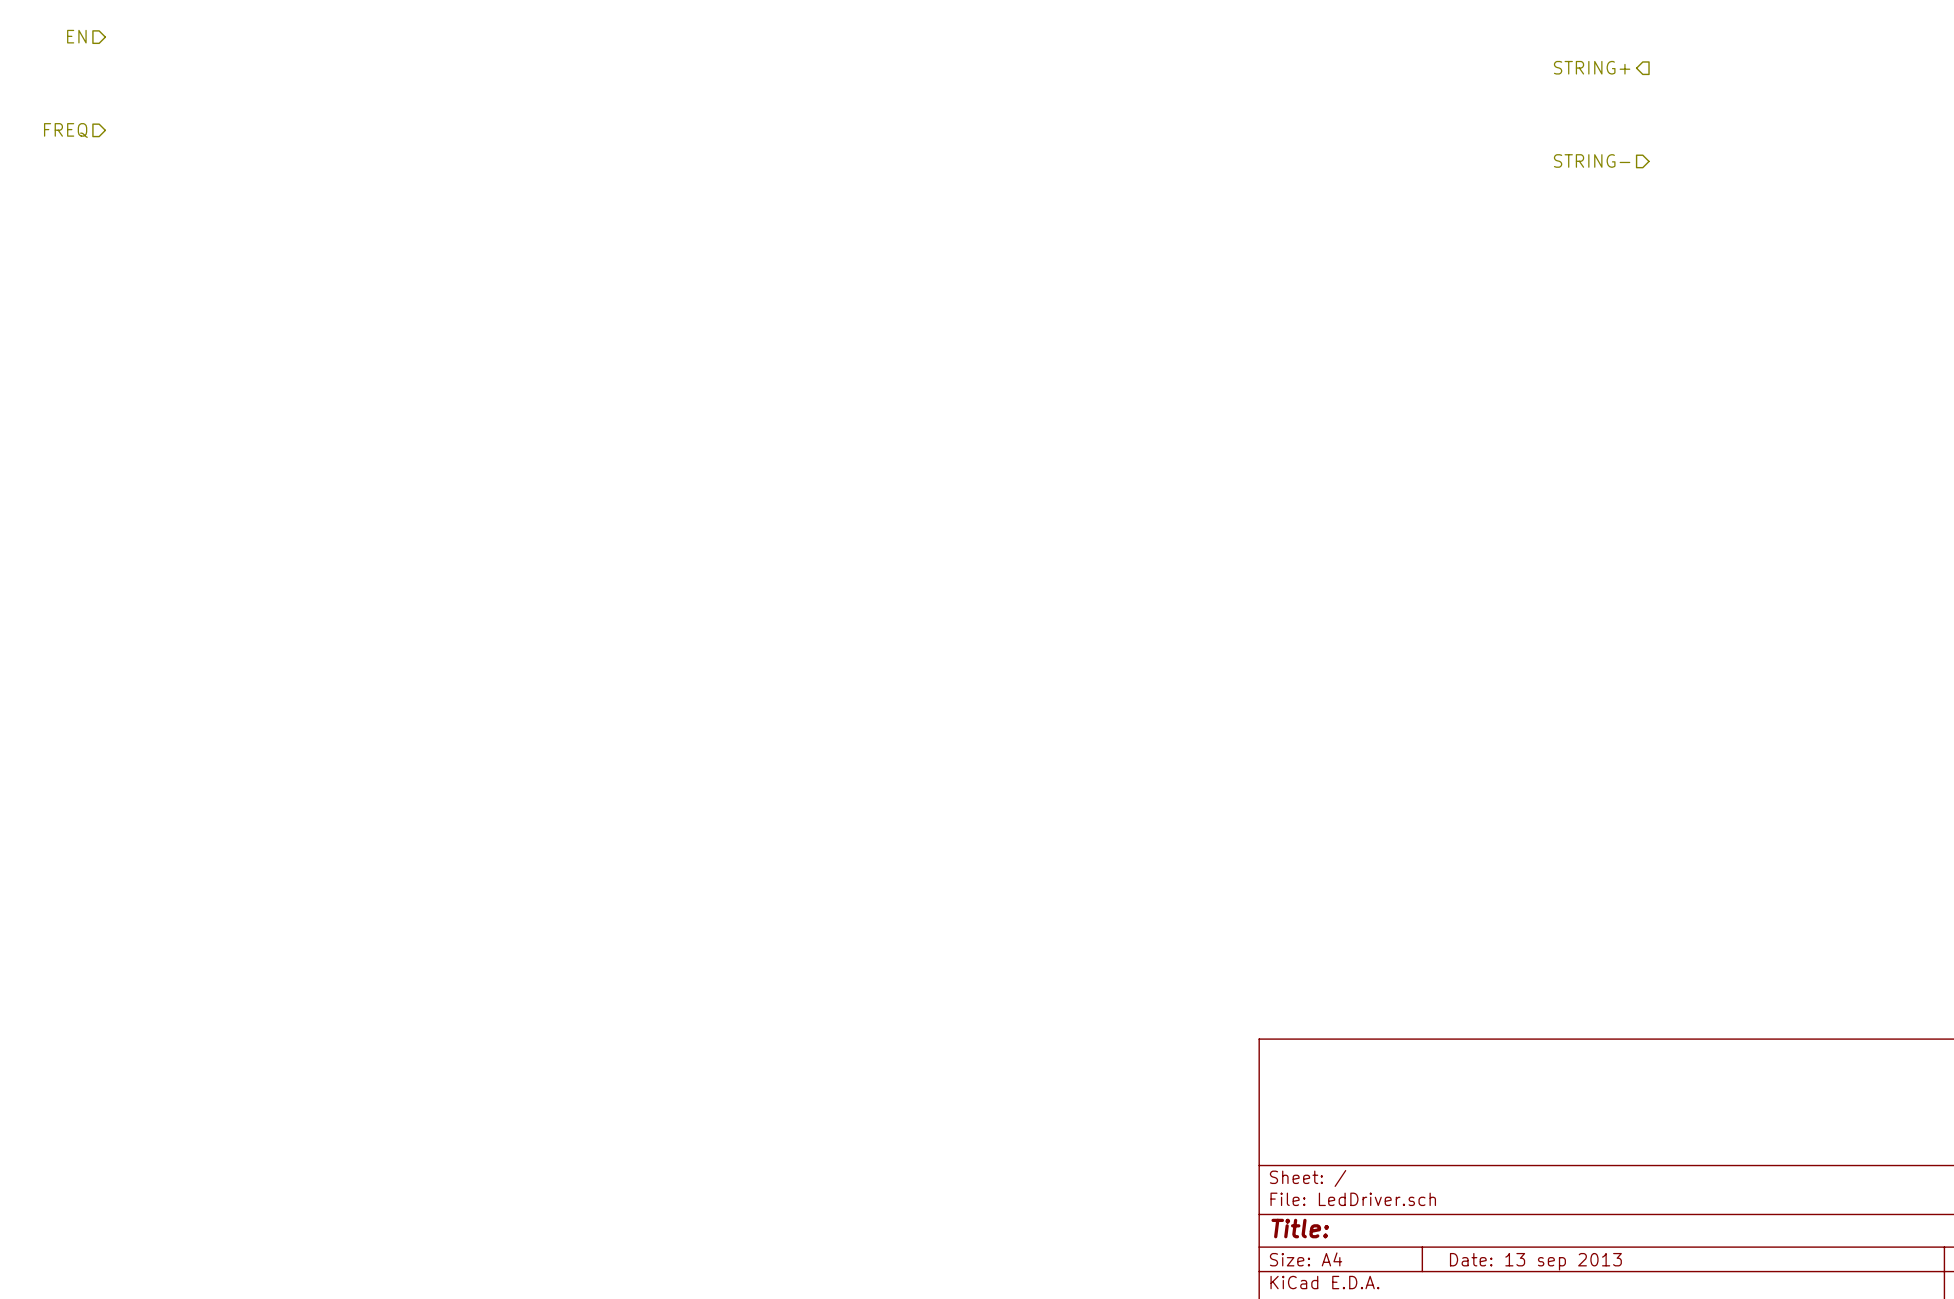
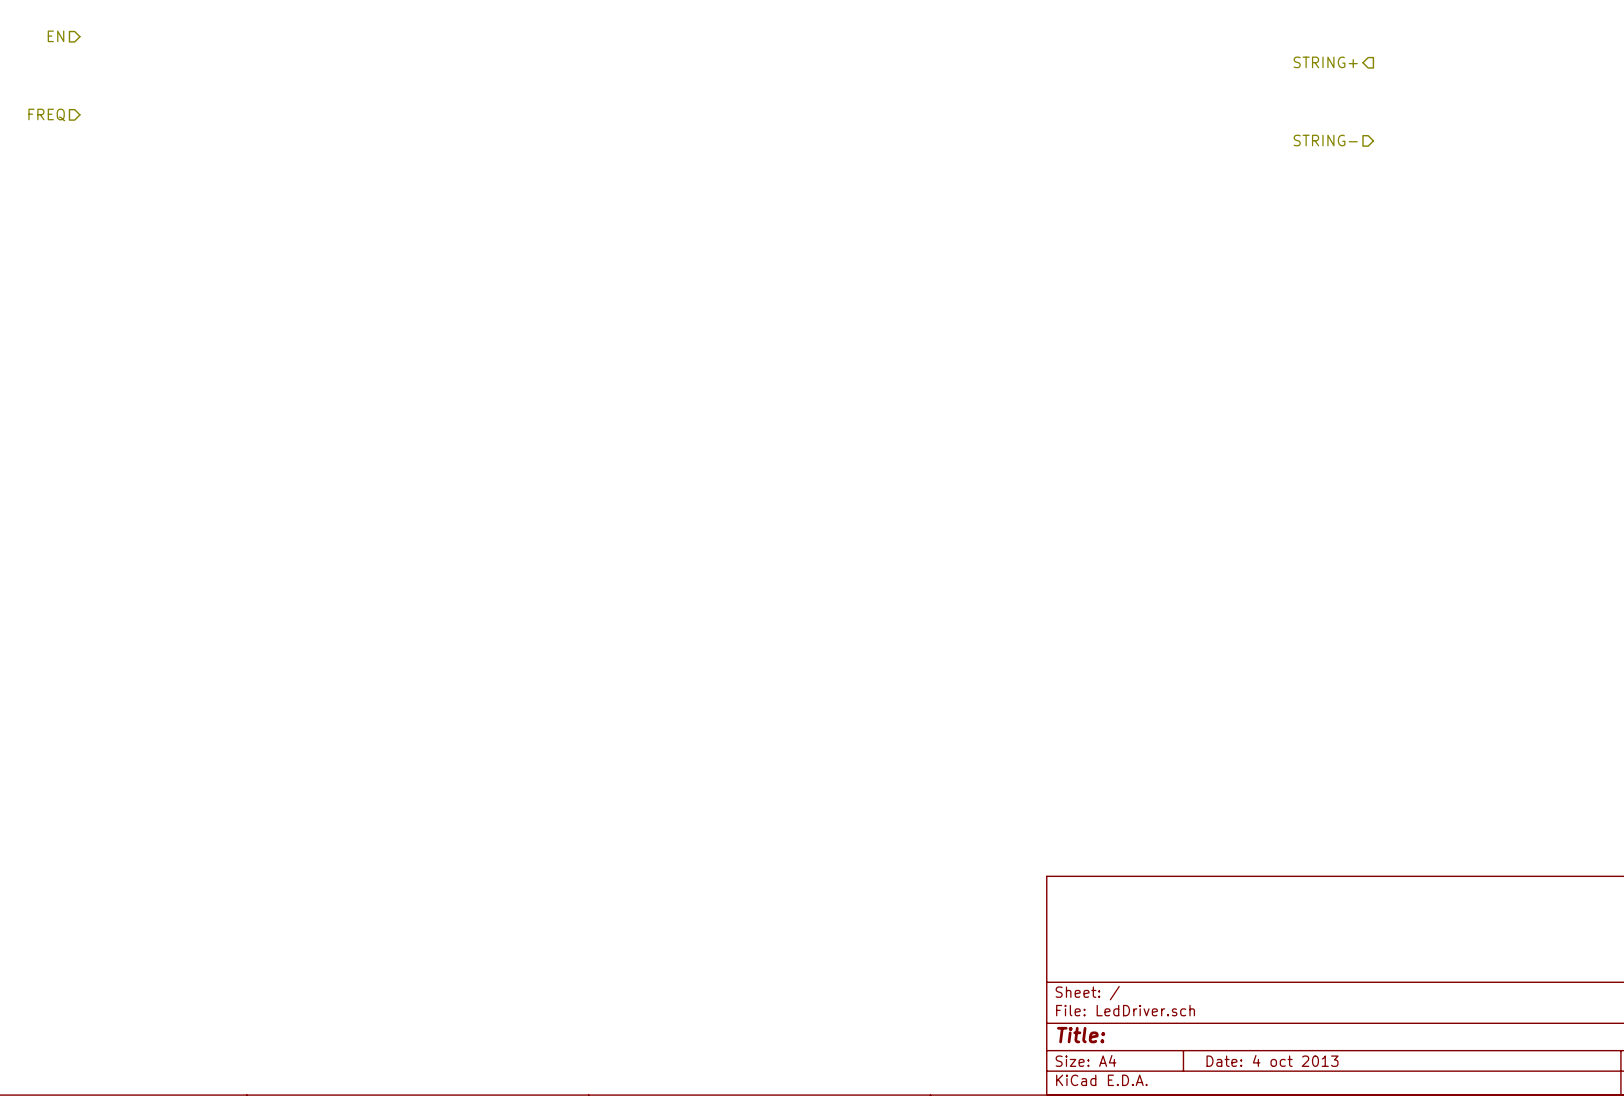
title block: Date: 13 sep 2013 (1535, 1261) -> Date: 4 oct 2013 (1272, 1060)

